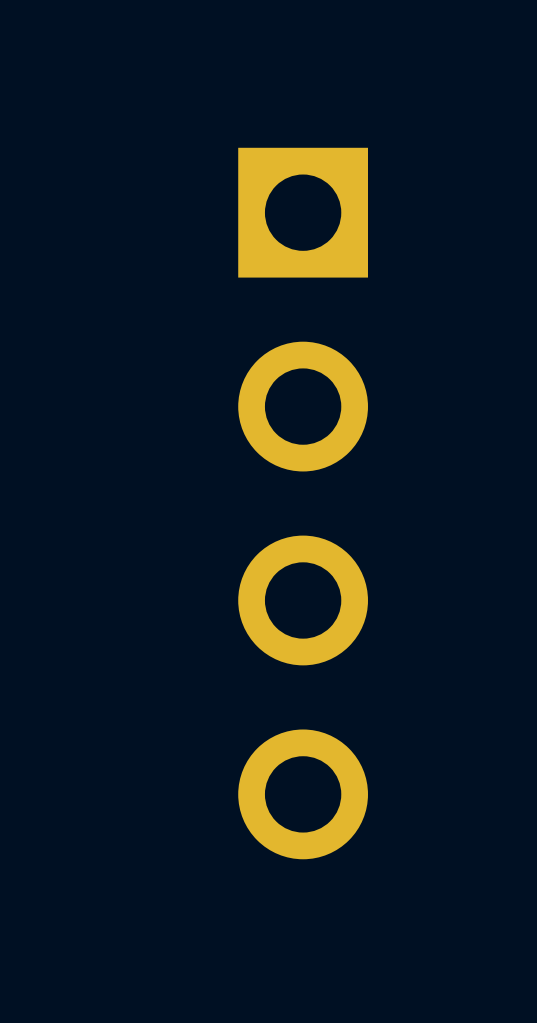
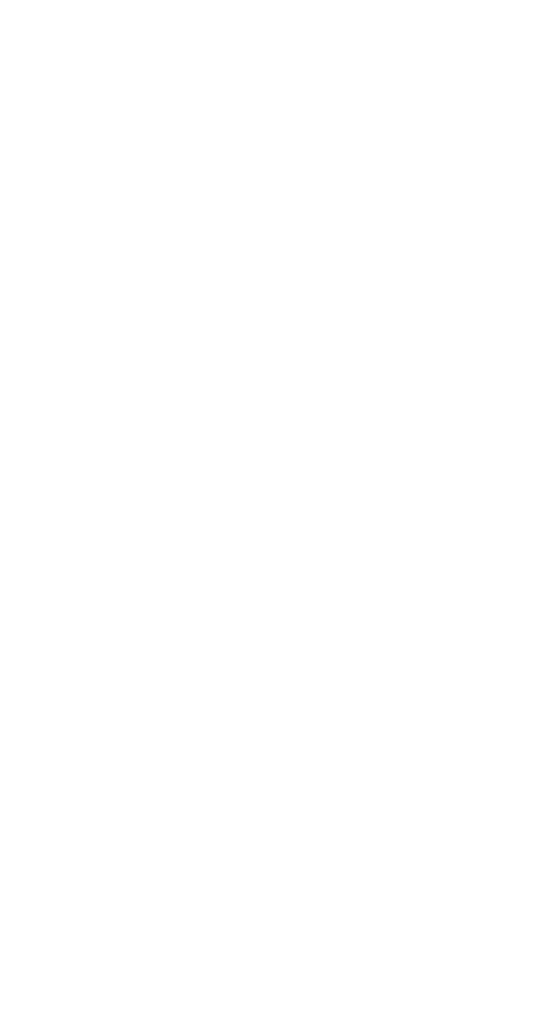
part: (303, 503) -> none

